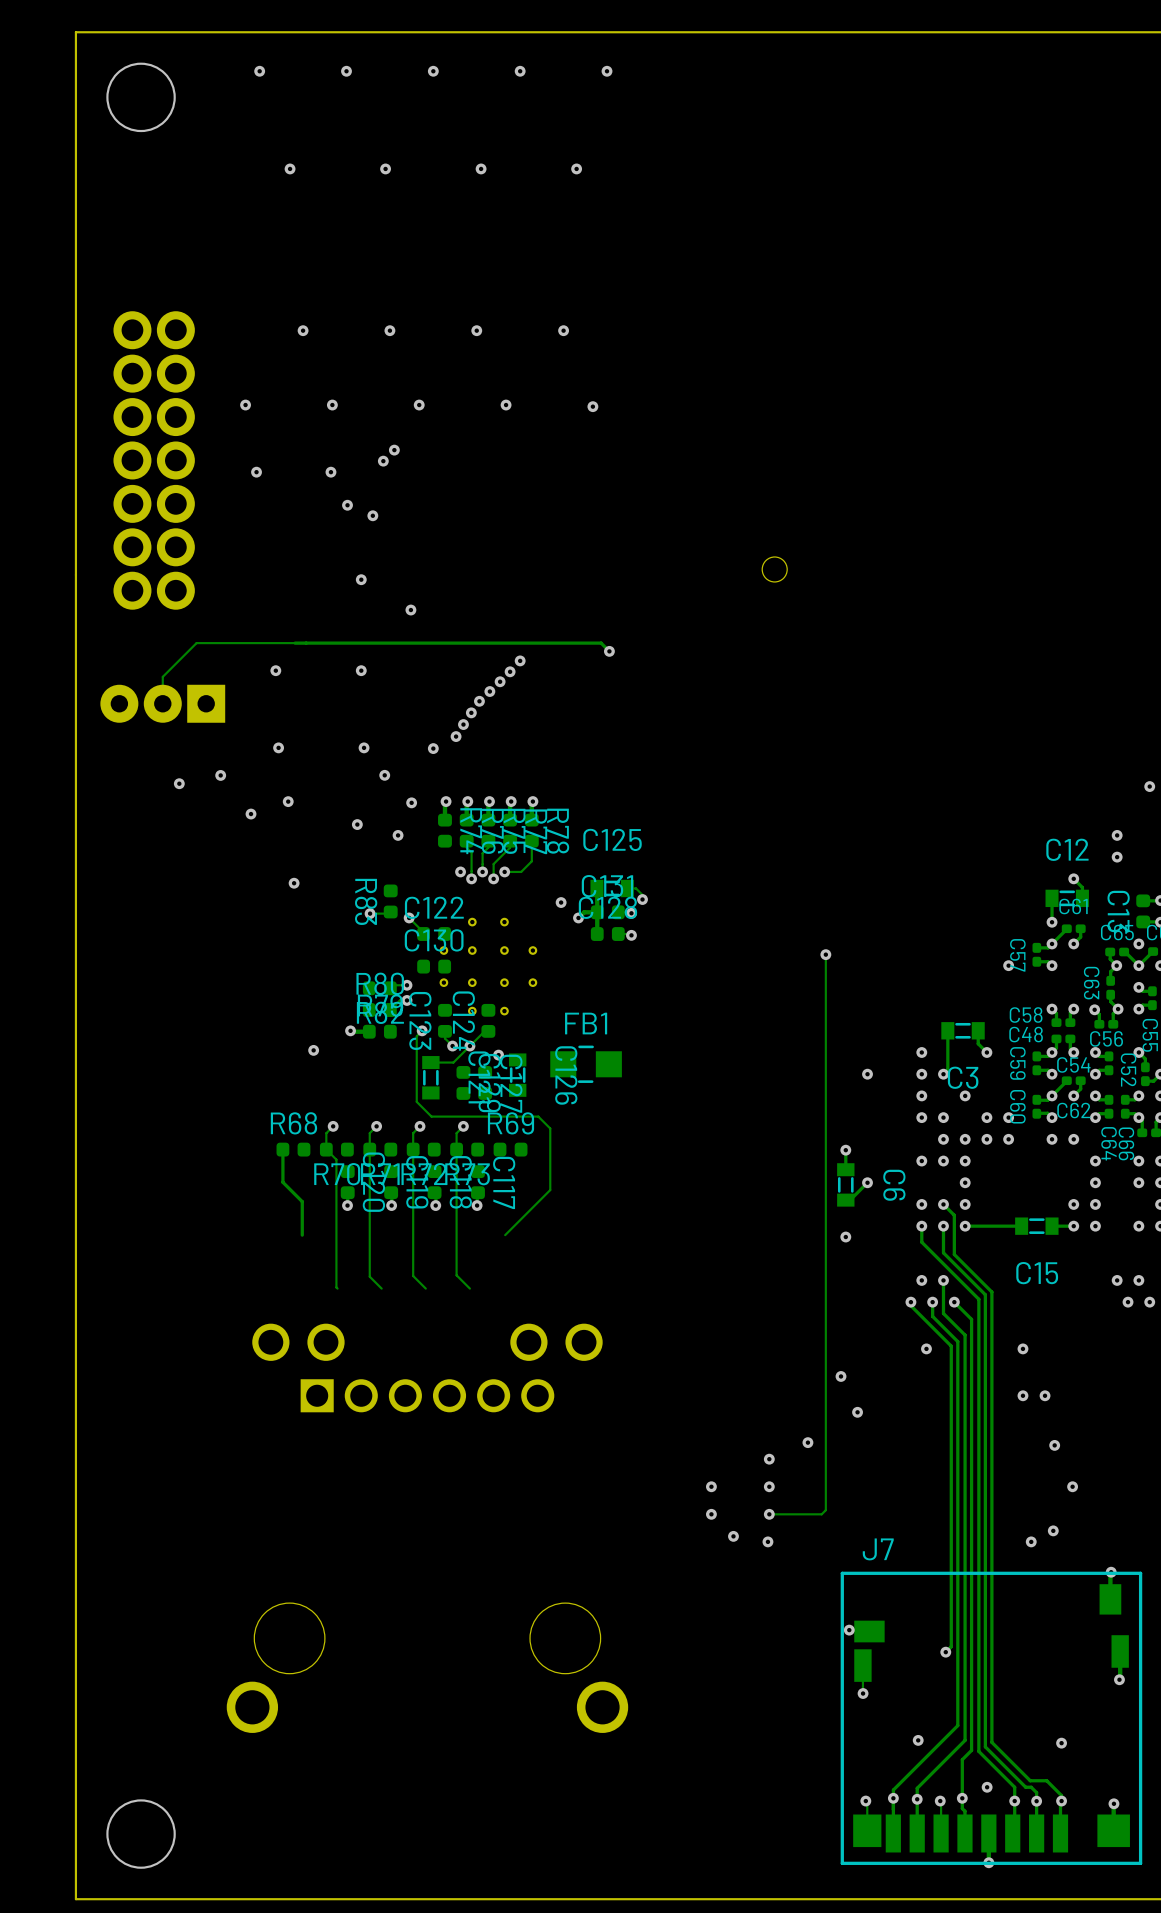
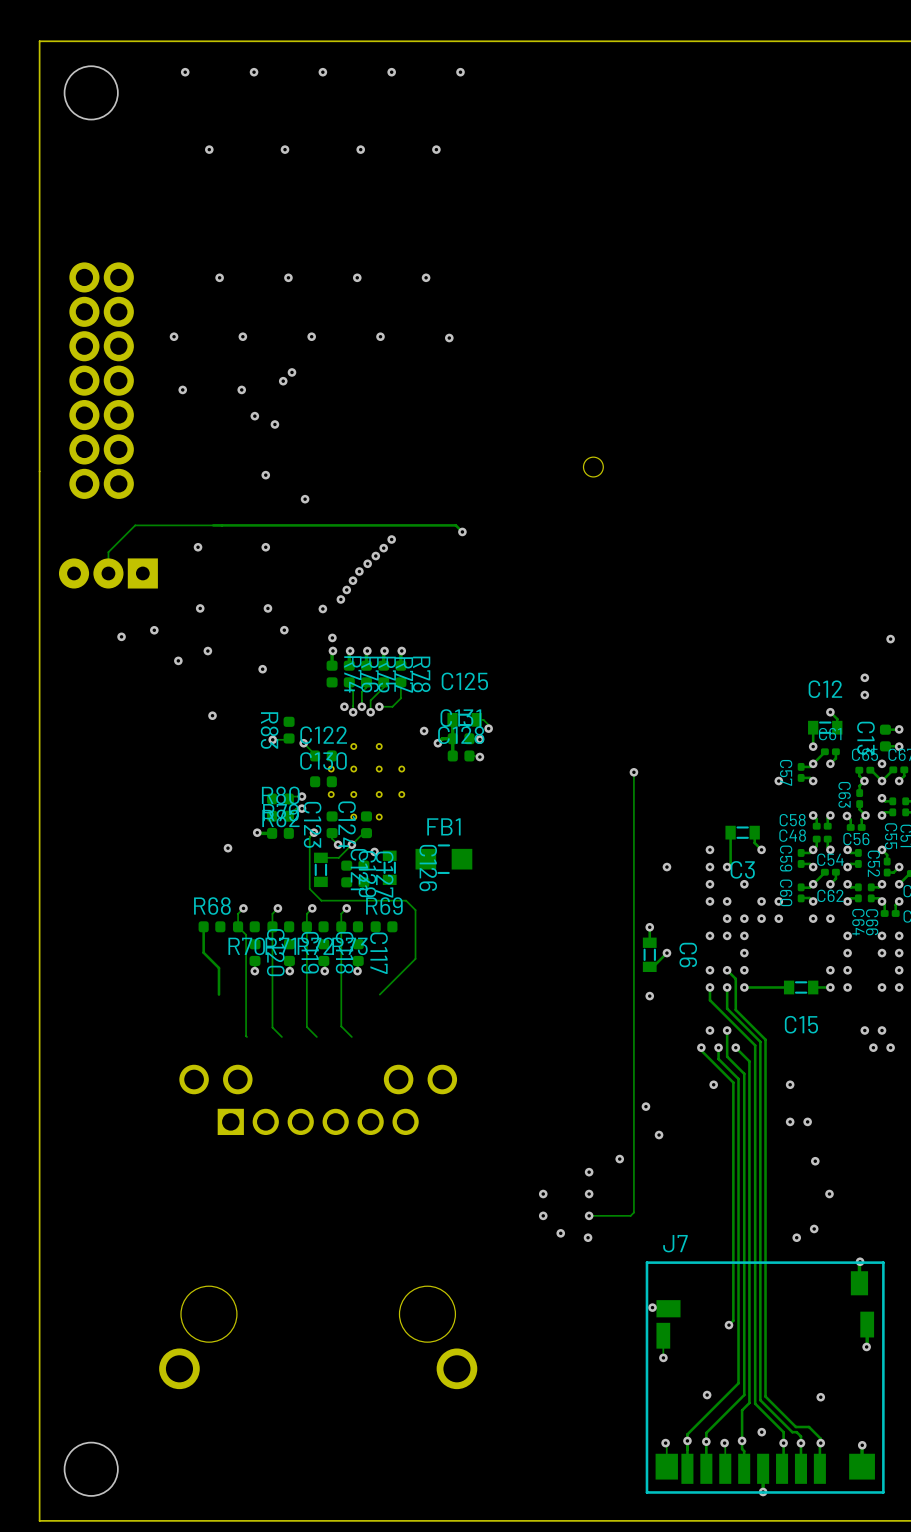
via: none -> (332, 637)
via: (411, 802) -> none
via: (398, 835) -> none

